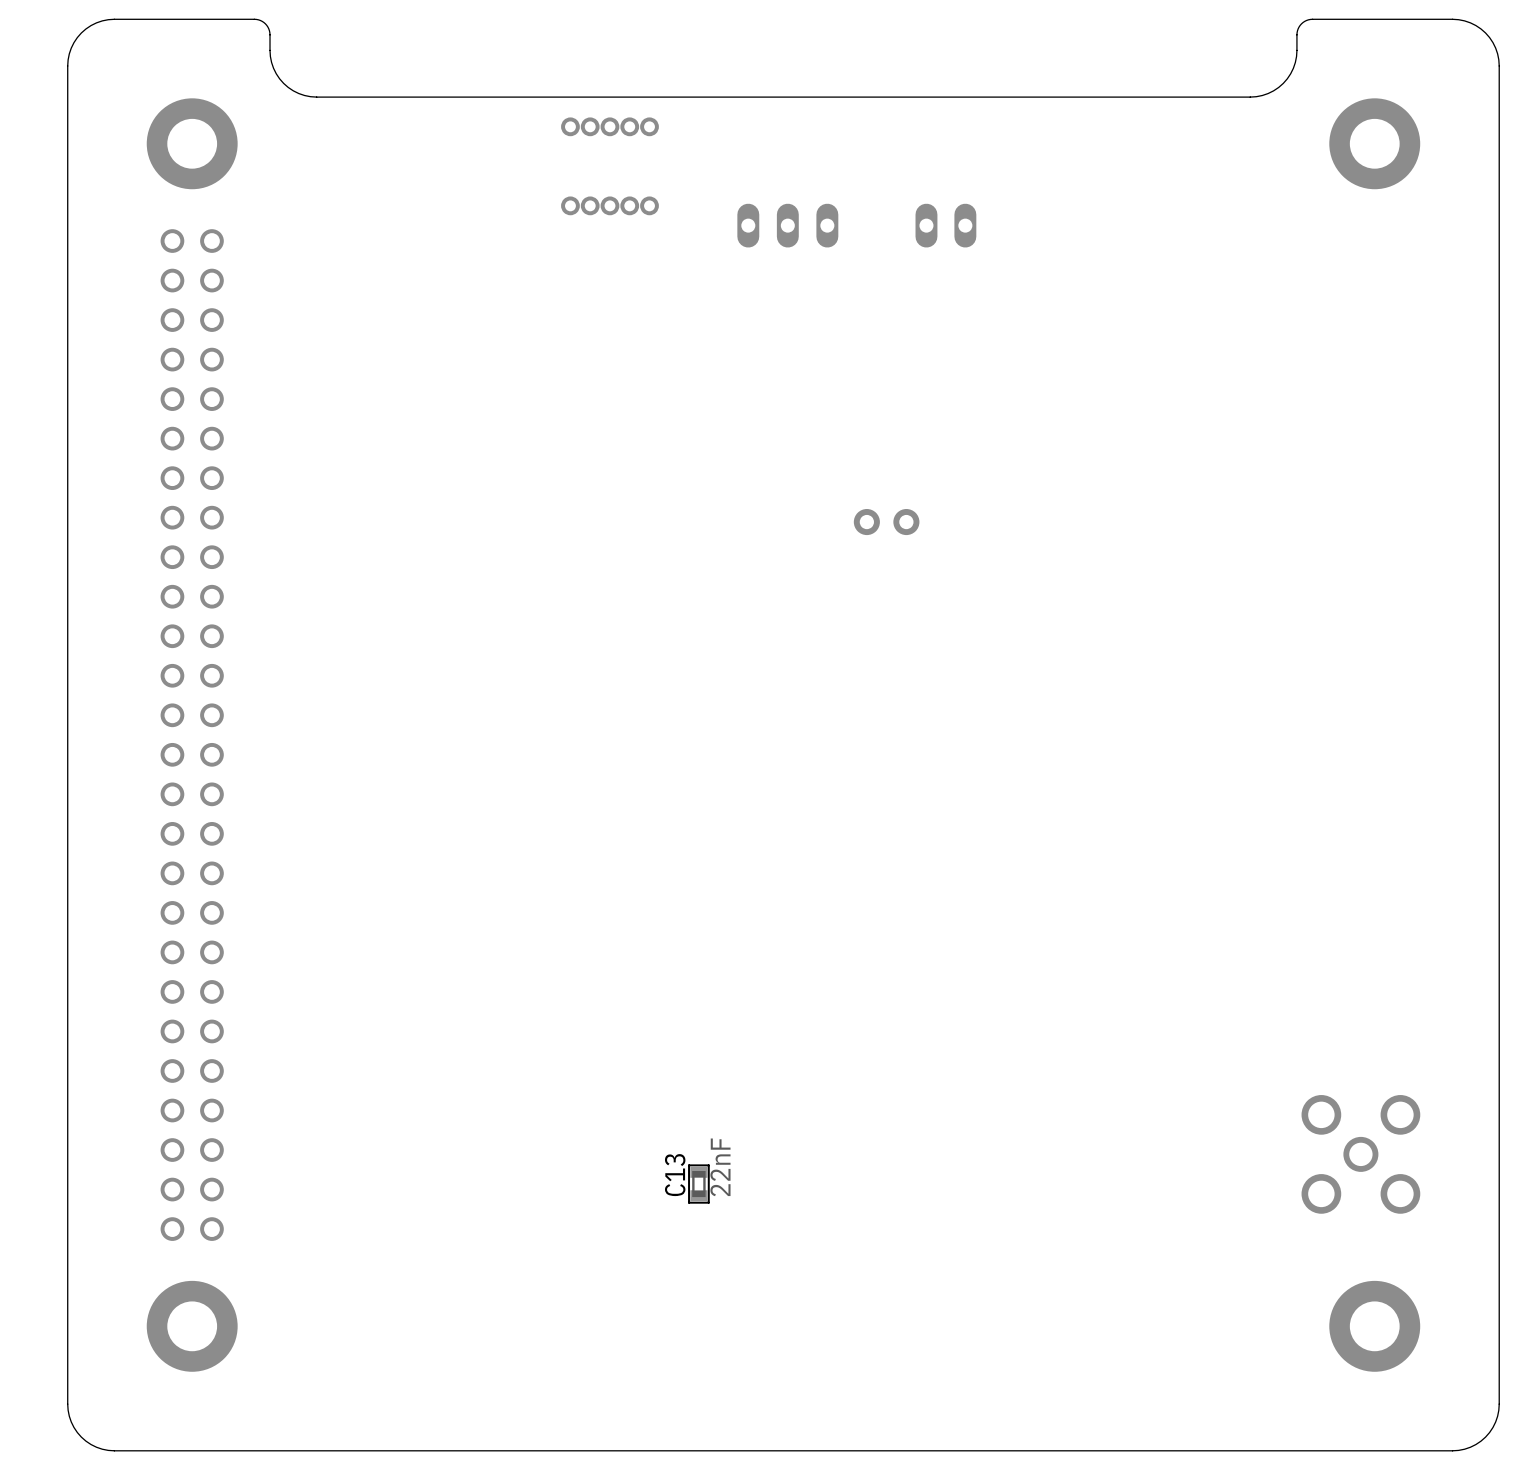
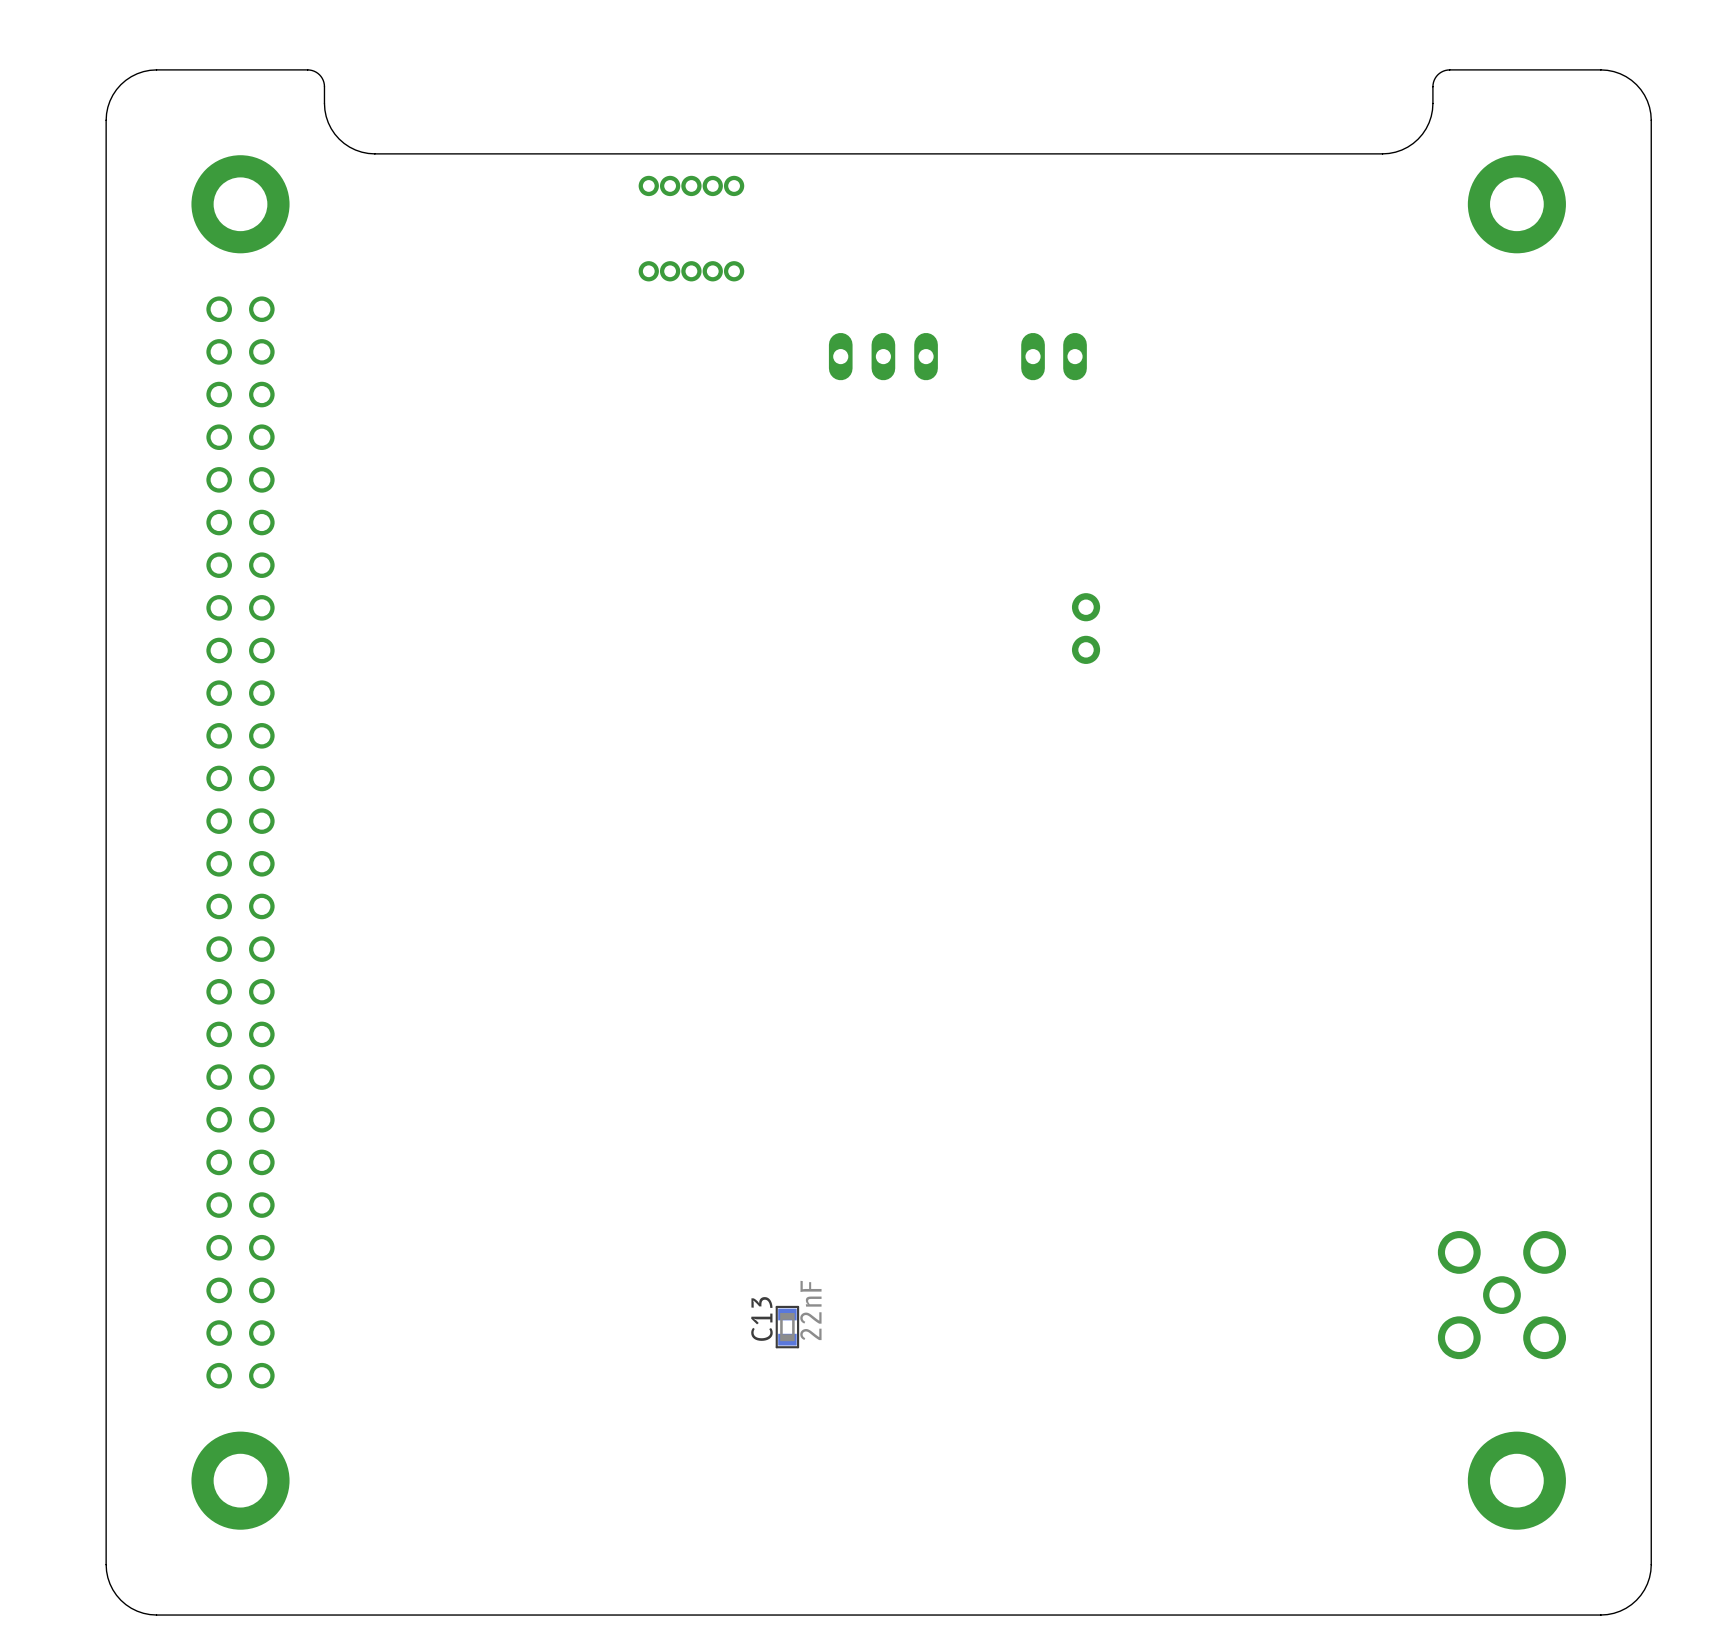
part position: (787, 225) -> (883, 356)
part position: (945, 225) -> (1054, 356)
part rotation: 0° (886, 522) -> 90° clockwise (1086, 628)
part position: (886, 522) -> (1086, 628)

